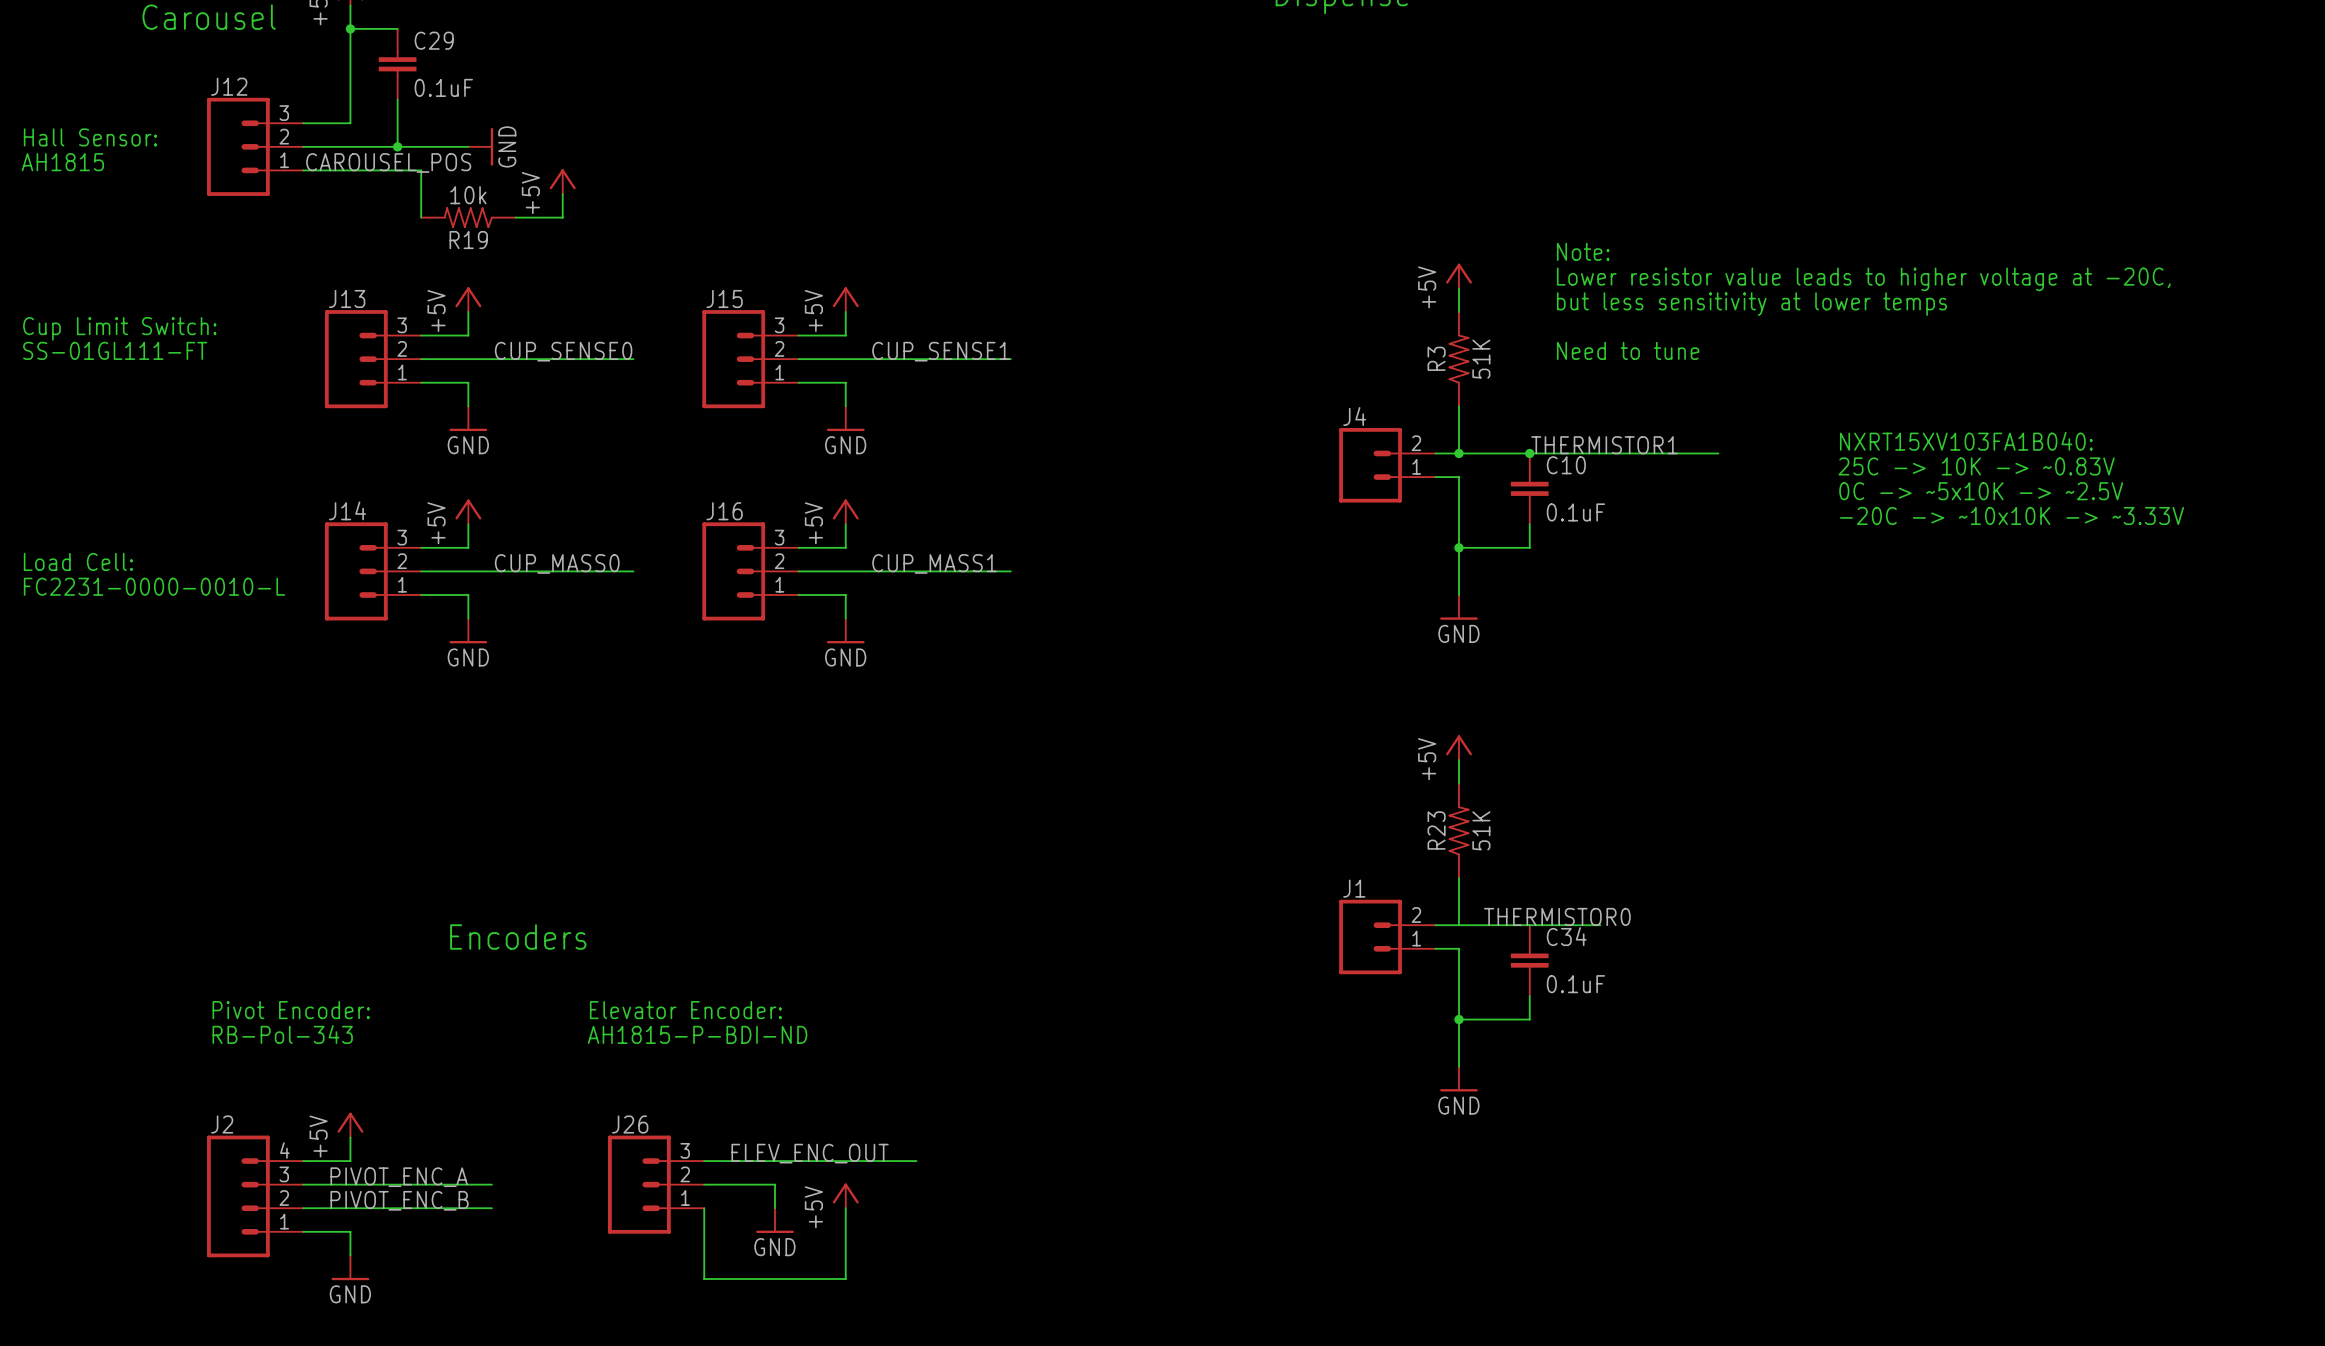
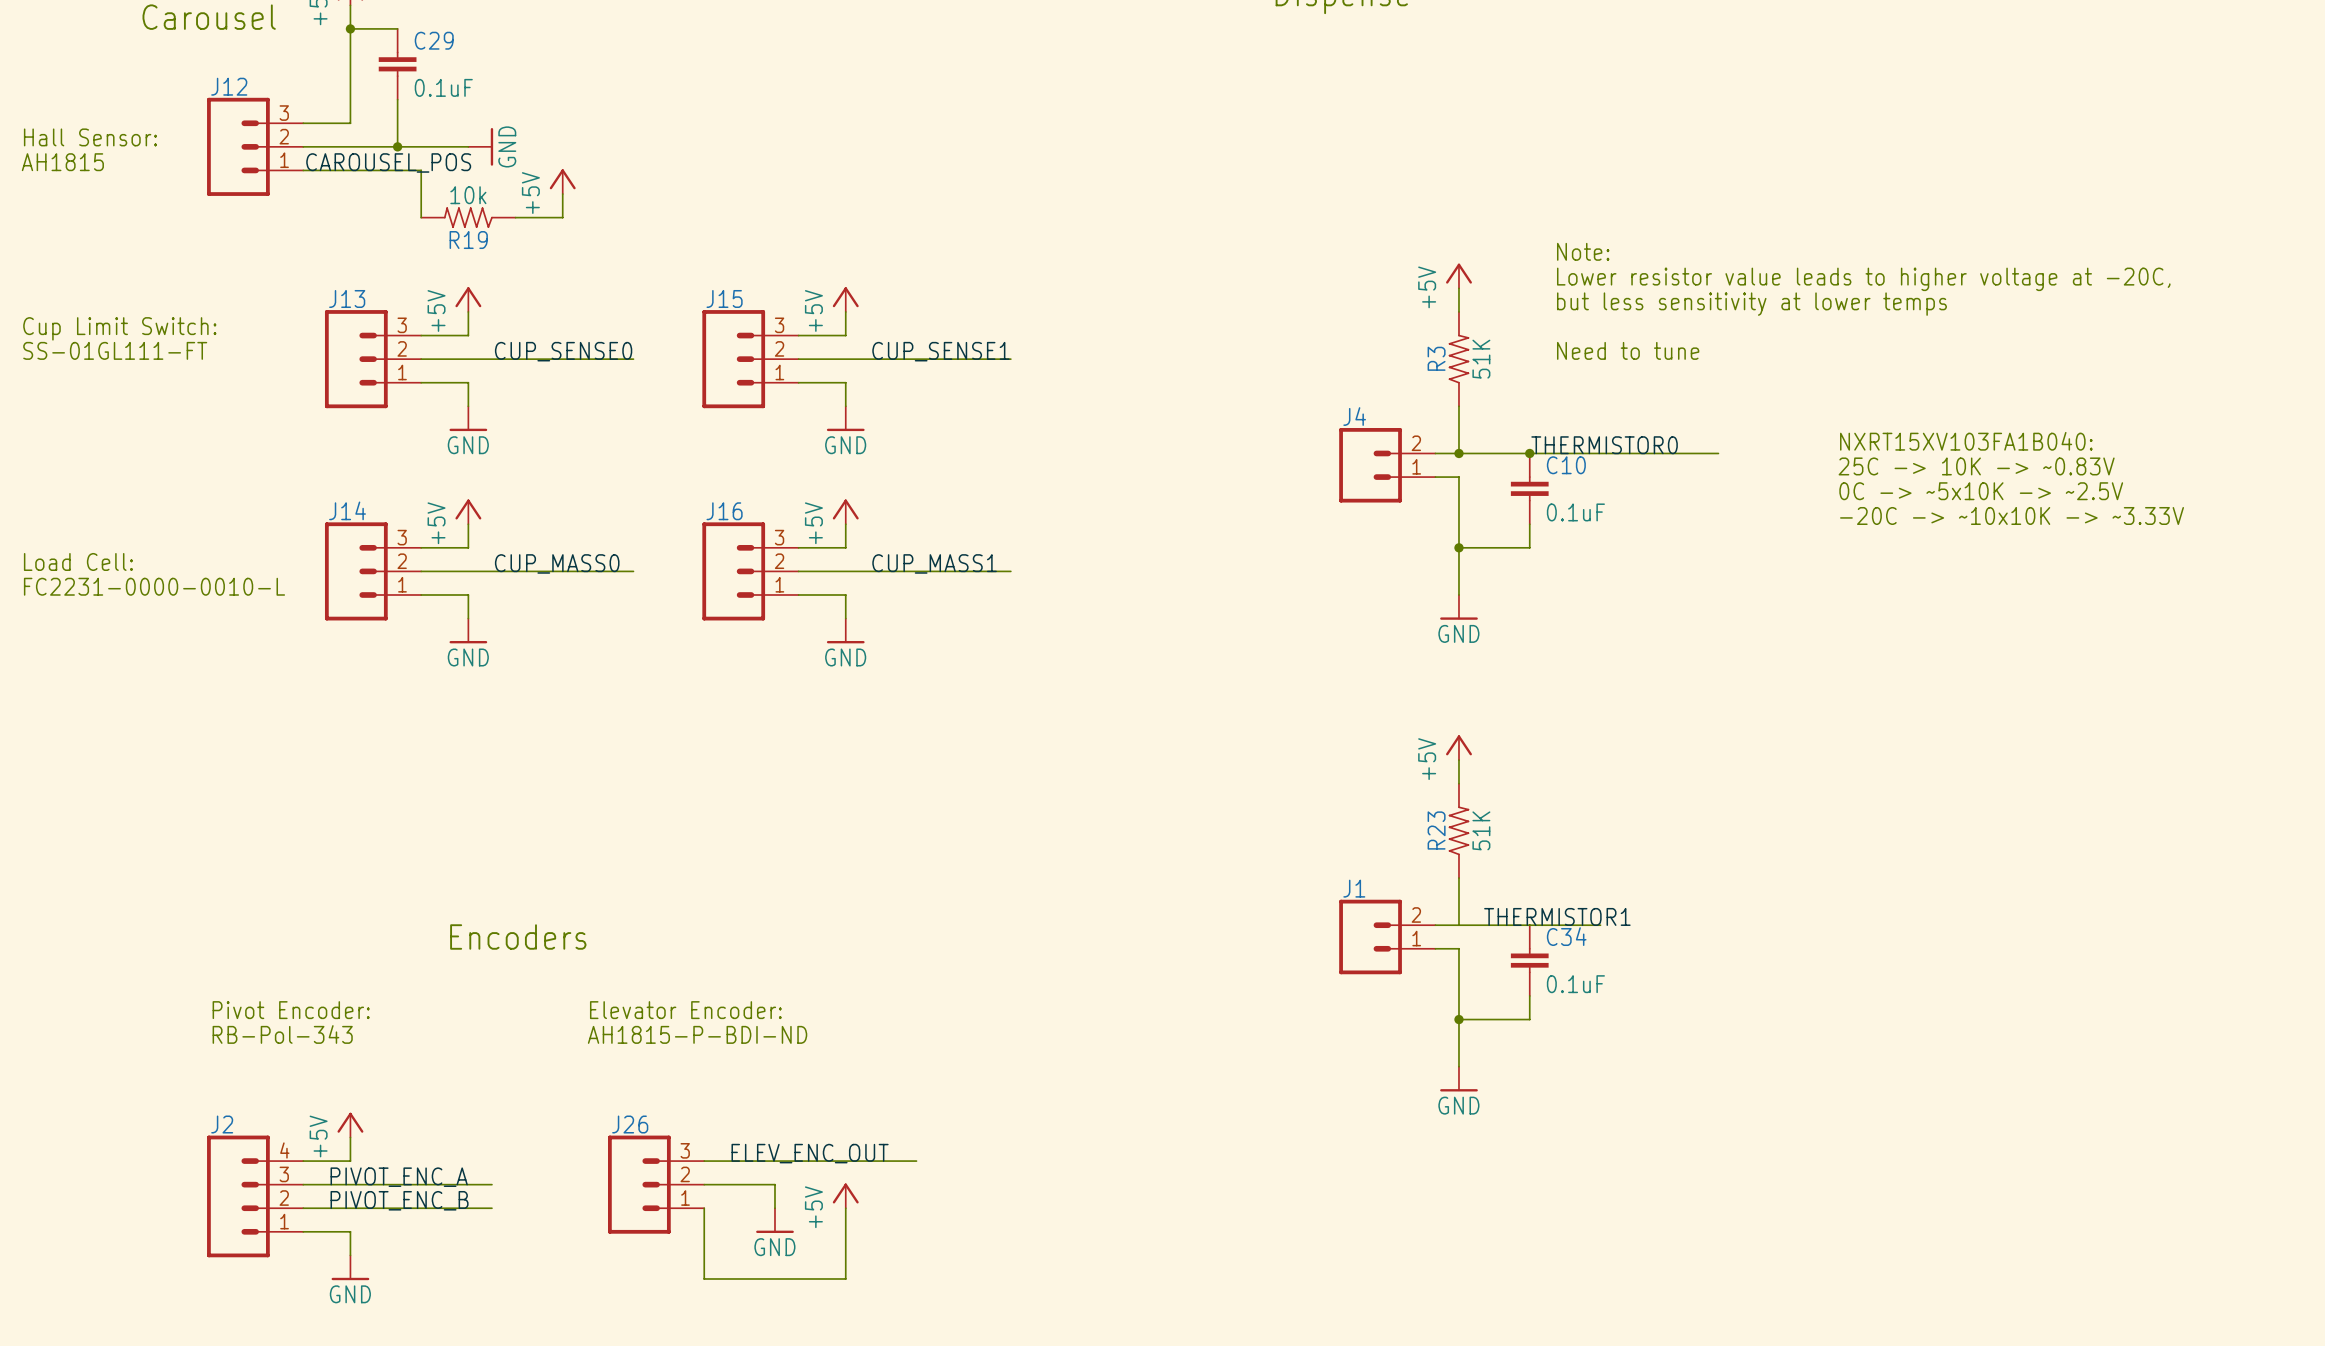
label: THERMISTOR1 (1604, 445) -> THERMISTOR0 (1604, 445)
label: THERMISTOR0 (1557, 916) -> THERMISTOR1 (1557, 916)

